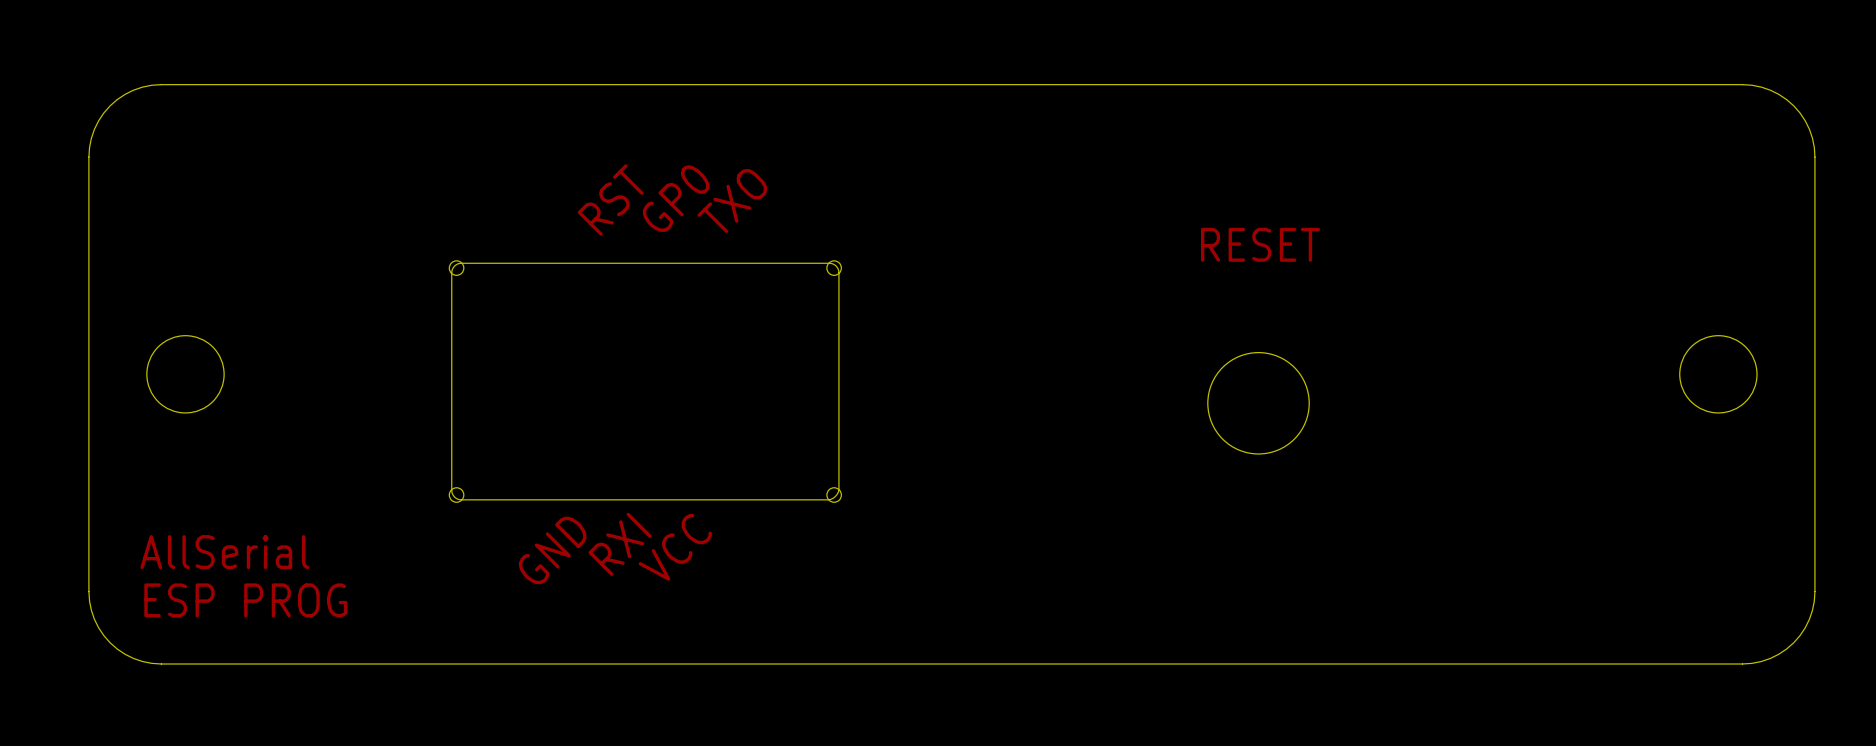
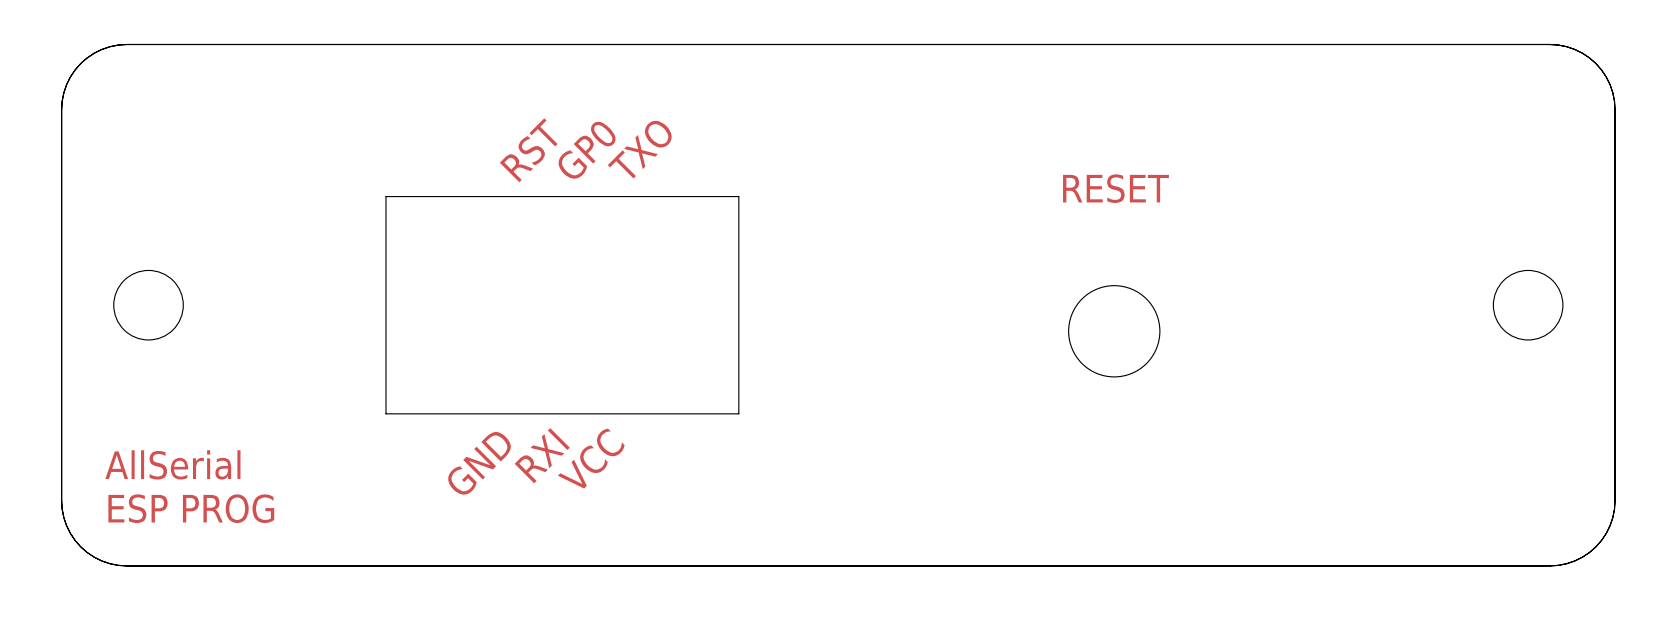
board edge: none -> (126, 44) (1549, 44) (1566, 46) (1589, 57) (1601, 69) (1610, 84) (1614, 101) (1615, 500) (1612, 517) (1601, 540) (1589, 552) (1566, 563) (1549, 565) (126, 565) (109, 563) (87, 552) (75, 540) (66, 525) (62, 509) (61, 109) (66, 84) (80, 63) (101, 49) (126, 44)
board edge: none -> (385, 196) (385, 413) (738, 413) (738, 196) (385, 196)
part: (645, 381) -> none

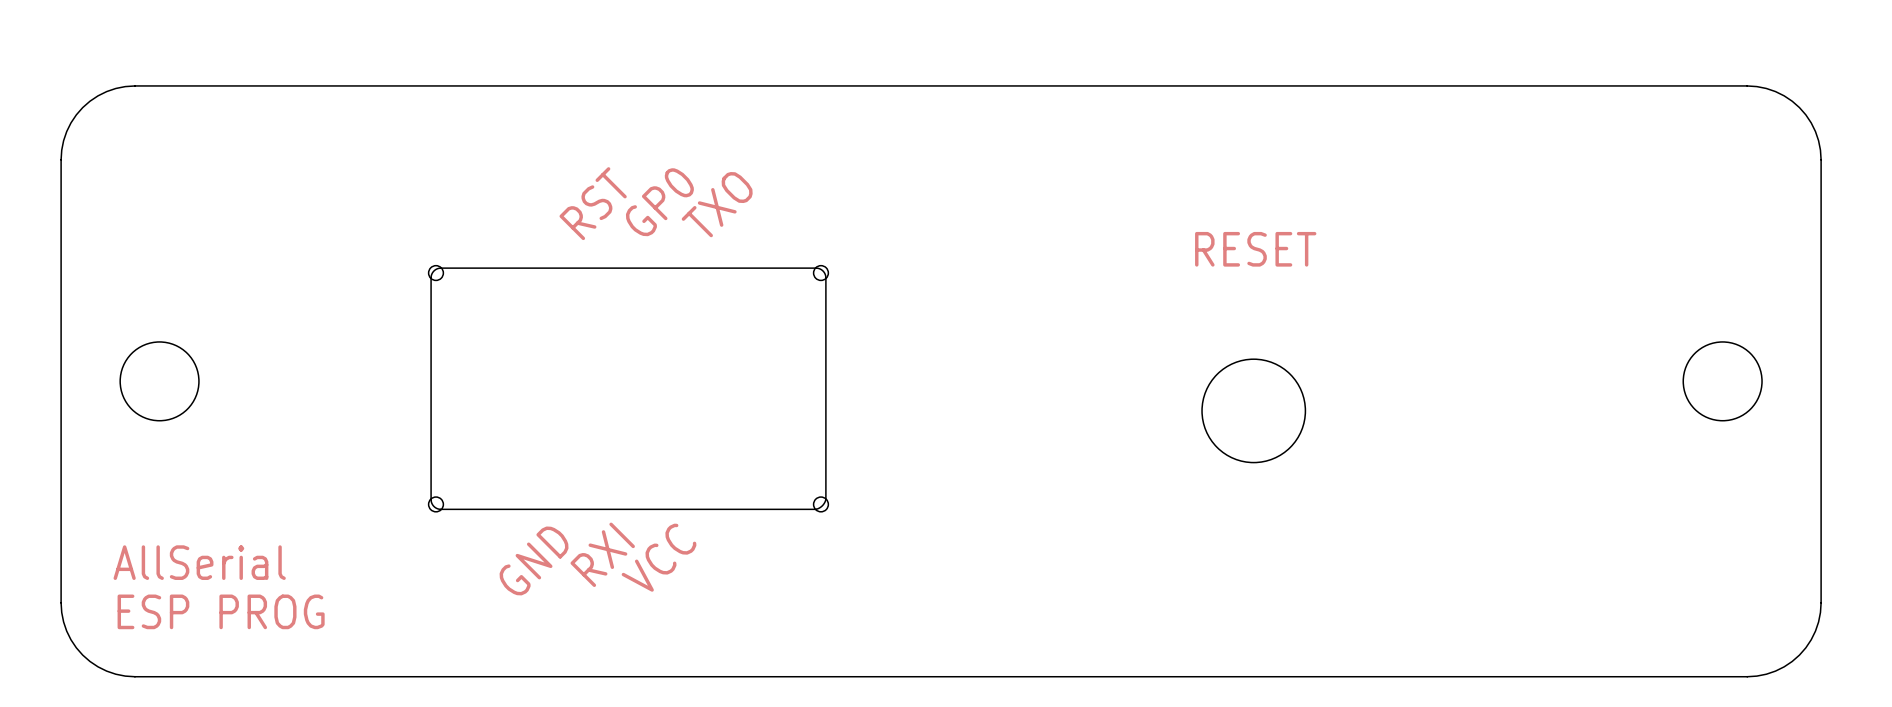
board edge: (126, 44) (1549, 44) (1566, 46) (1589, 57) (1601, 69) (1610, 84) (1614, 101) (1615, 500) (1612, 517) (1601, 540) (1589, 552) (1566, 563) (1549, 565) (126, 565) (109, 563) (87, 552) (75, 540) (66, 525) (62, 509) (61, 109) (66, 84) (80, 63) (101, 49) (126, 44) -> none
board edge: (385, 196) (385, 413) (738, 413) (738, 196) (385, 196) -> none
part: none -> (628, 388)

